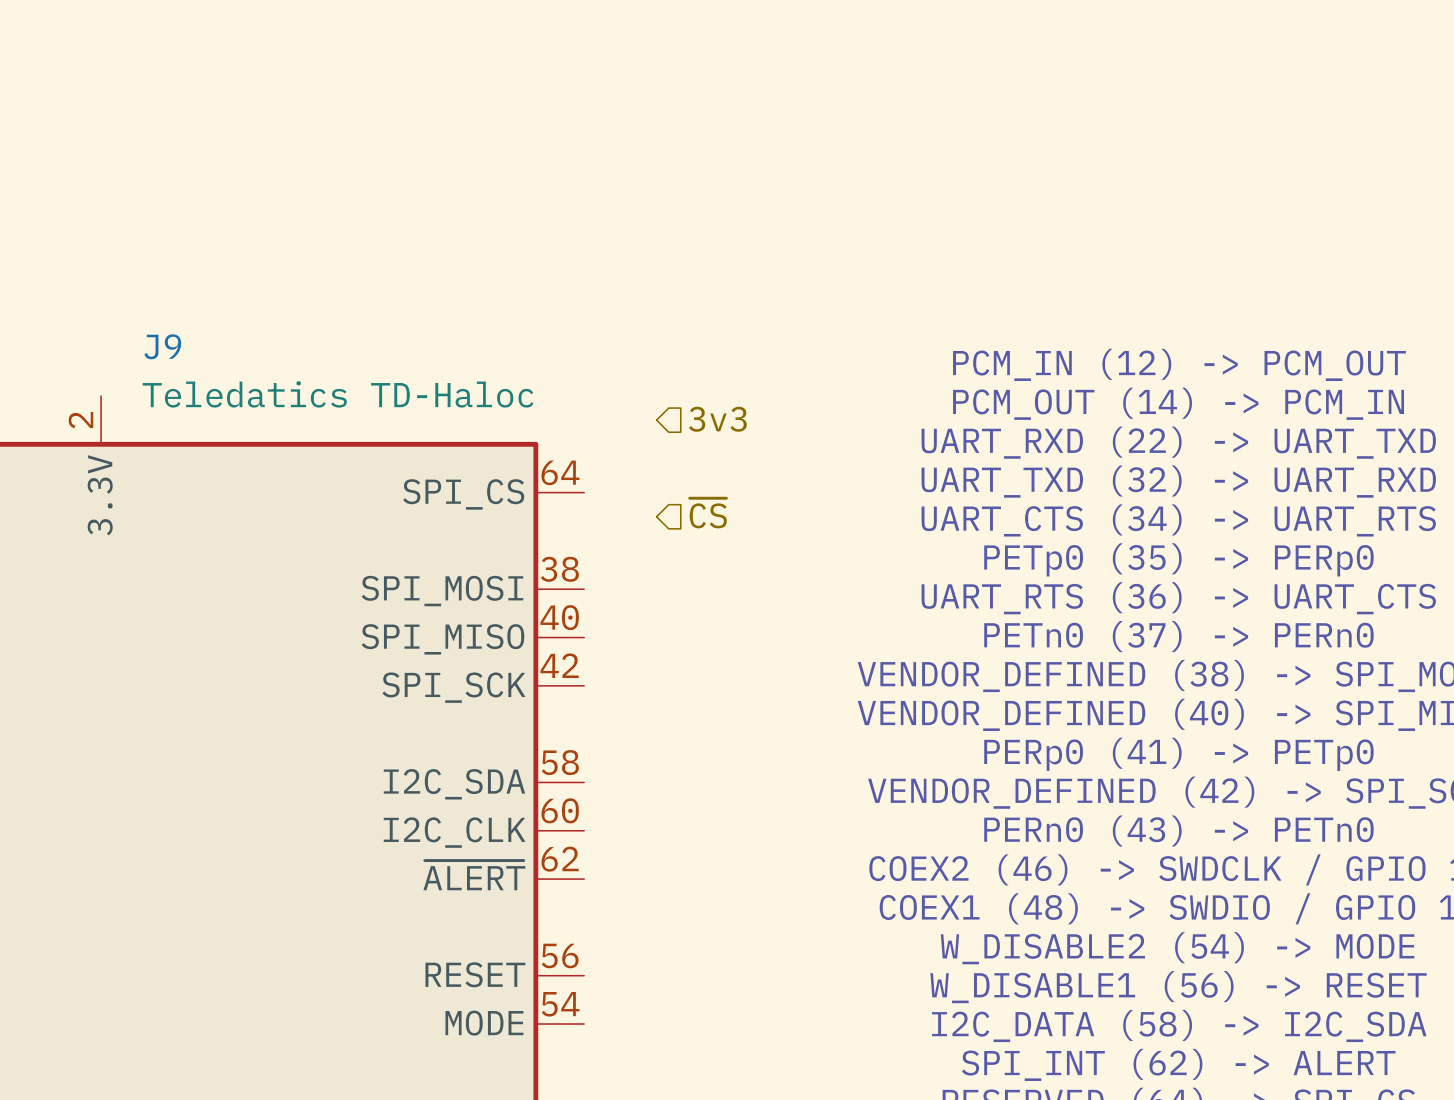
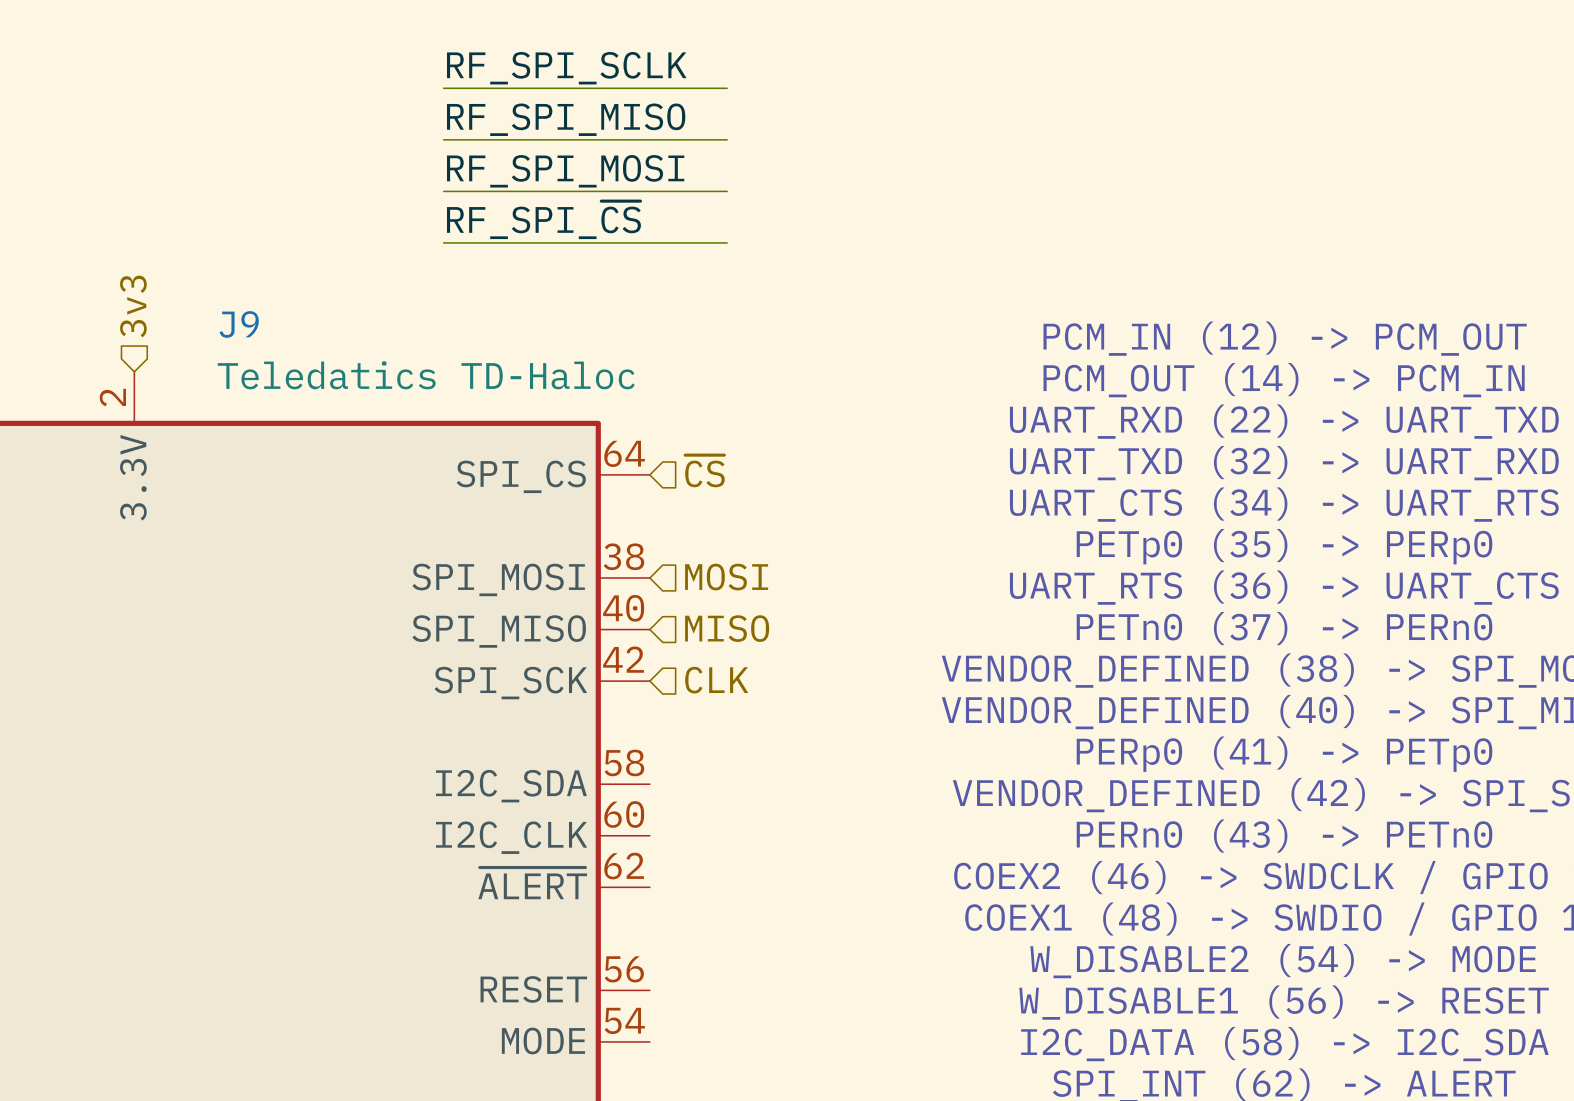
label: none -> RF_SPI_SCLK (566, 68)
wire: none -> (443, 88) (727, 88)
label: none -> RF_SPI_MISO (566, 119)
wire: none -> (443, 139) (727, 139)
label: none -> RF_SPI_MOSI (565, 171)
wire: none -> (443, 191) (727, 191)
label: none -> RF_SPI_~{CS} (543, 220)
wire: none -> (443, 242) (727, 242)
hierarchical label: none -> 3v3 (133, 306)
J9 name position: J9 (162, 346) -> J9 (239, 324)
J9 value position: Teledatics TD-Haloc (338, 394) -> Teledatics TD-Haloc (426, 375)
hierarchical label: 3v3 (717, 419) -> none
hierarchical label position: ~{CS} (708, 513) -> ~{CS} (704, 471)
hierarchical label: none -> MOSI (726, 577)
hierarchical label: none -> MISO (727, 628)
hierarchical label: none -> CLK (716, 680)

